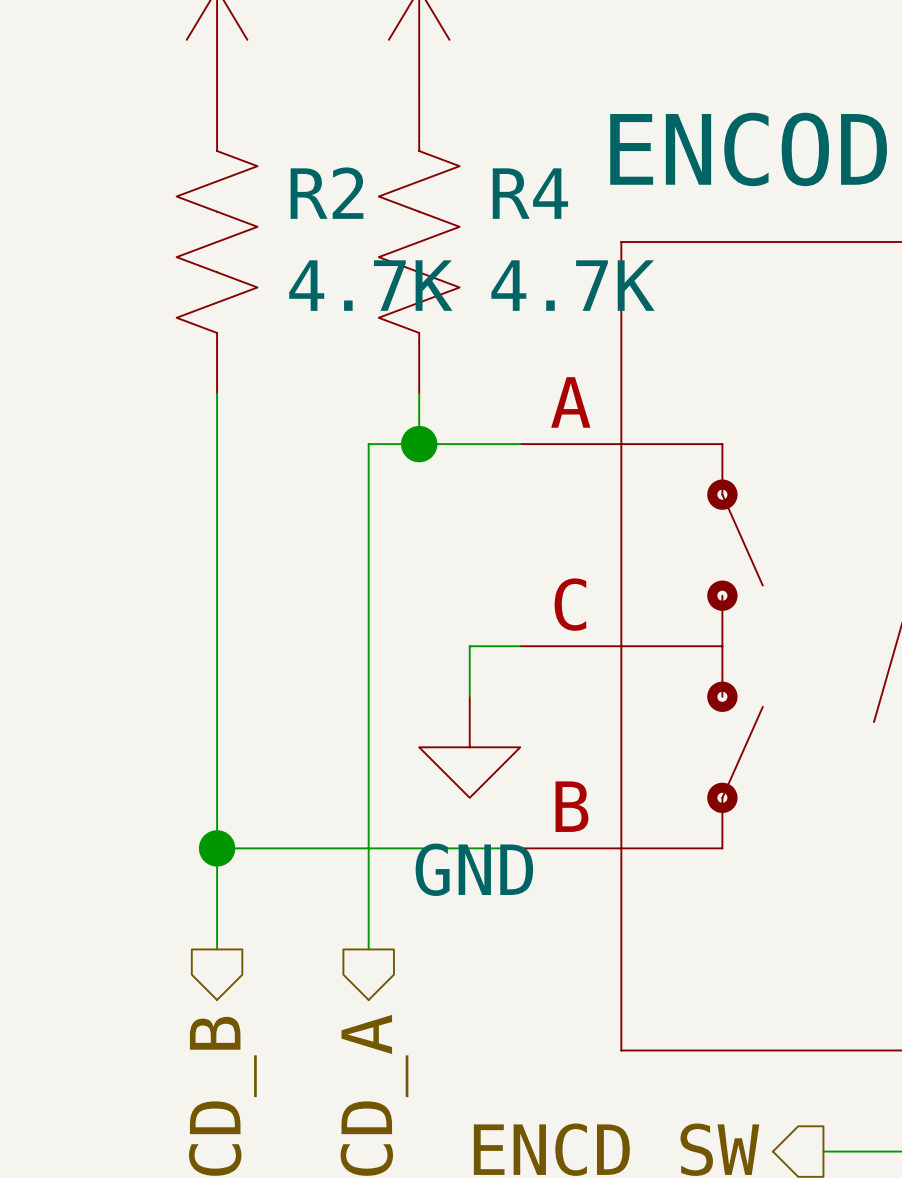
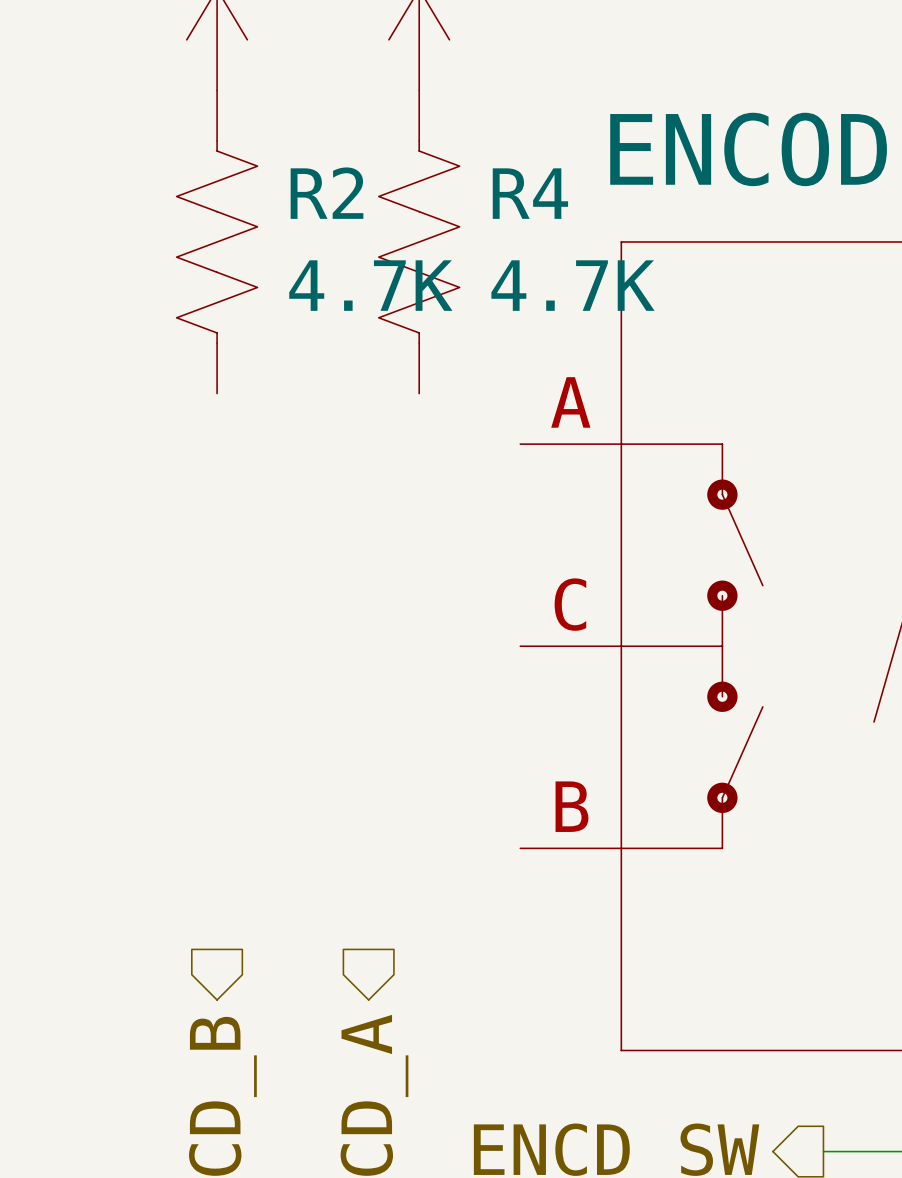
wire: (217, 393) (217, 949) -> none
wire: (419, 393) (419, 444) -> none
junction: (419, 444) -> none
wire: (520, 444) (368, 444) (368, 949) -> none
wire: (520, 646) (469, 646) (469, 696) -> none
power symbol: GND (469, 747) -> none
wire: (217, 848) (520, 848) -> none
junction: (217, 848) -> none

